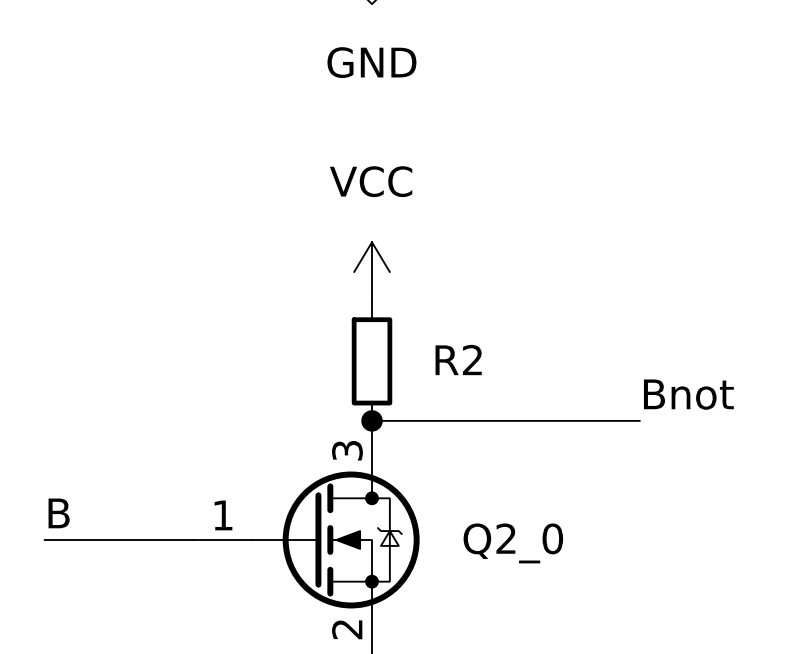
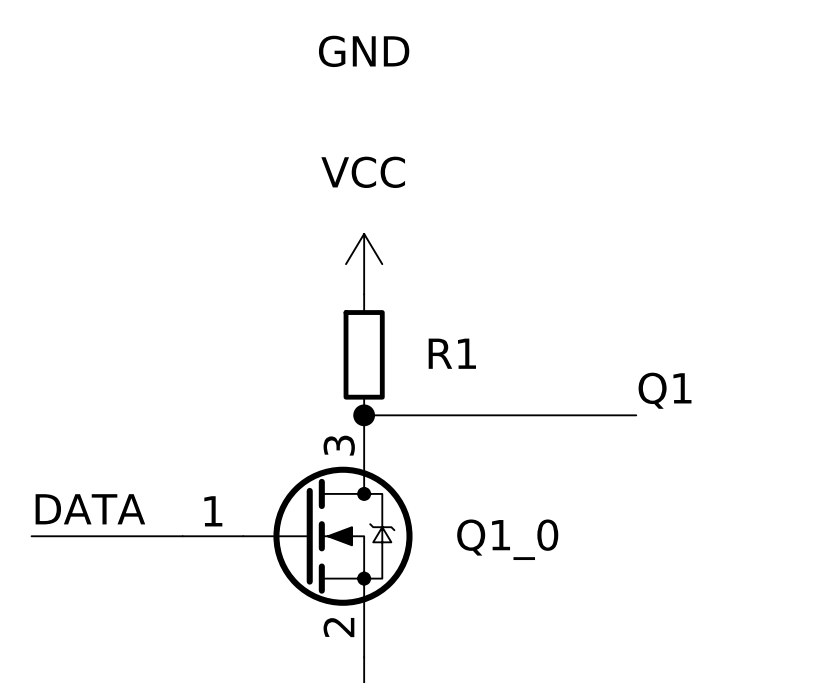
R2 name: R2 (458, 359) -> R1 (452, 353)
label: Bnot (688, 394) -> Q1 (665, 390)
label: B (59, 513) -> DATA (90, 509)
Q2_0 name: Q2_0 (513, 543) -> Q1_0 (507, 539)

